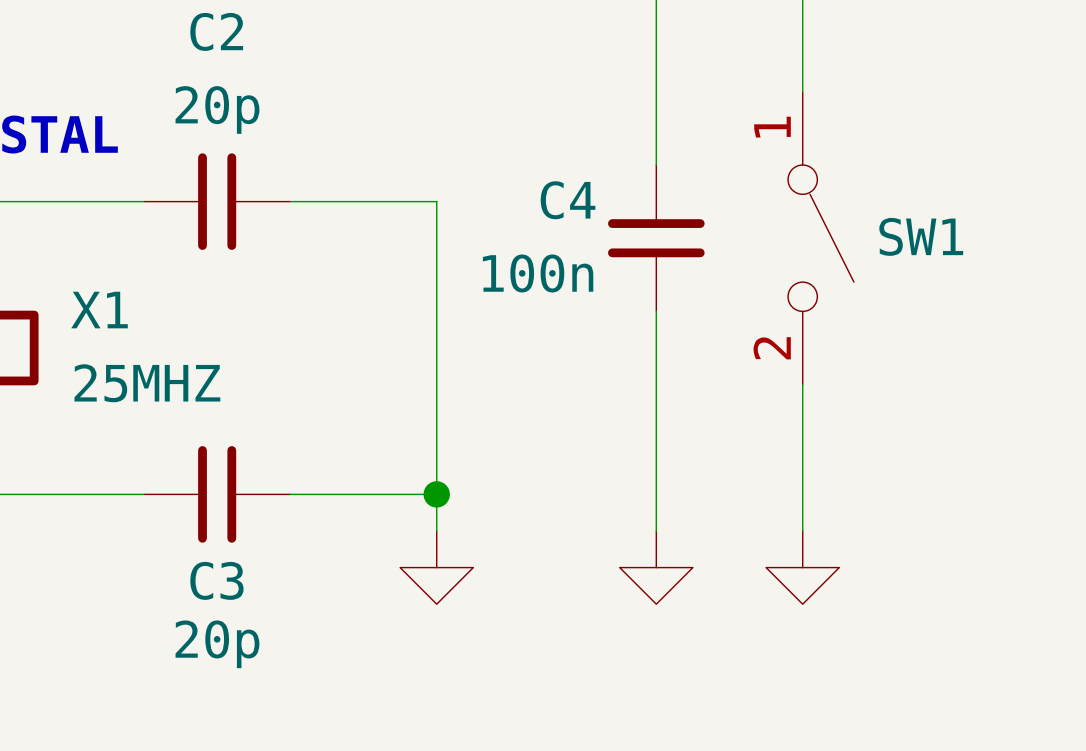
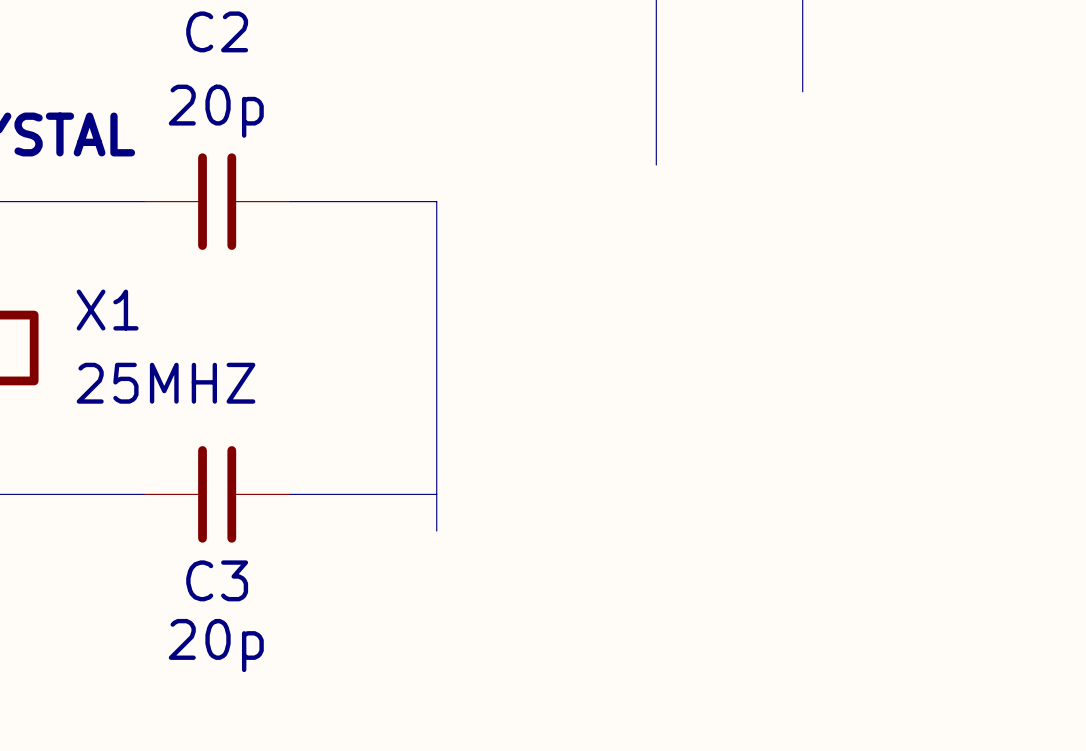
C4: 100n (656, 238) -> none
SW1: (821, 238) -> none
wire: (656, 311) (656, 530) -> none
wire: (802, 384) (802, 530) -> none
junction: (436, 494) -> none
power symbol: (436, 567) -> none
power symbol: (656, 567) -> none
power symbol: (802, 567) -> none

